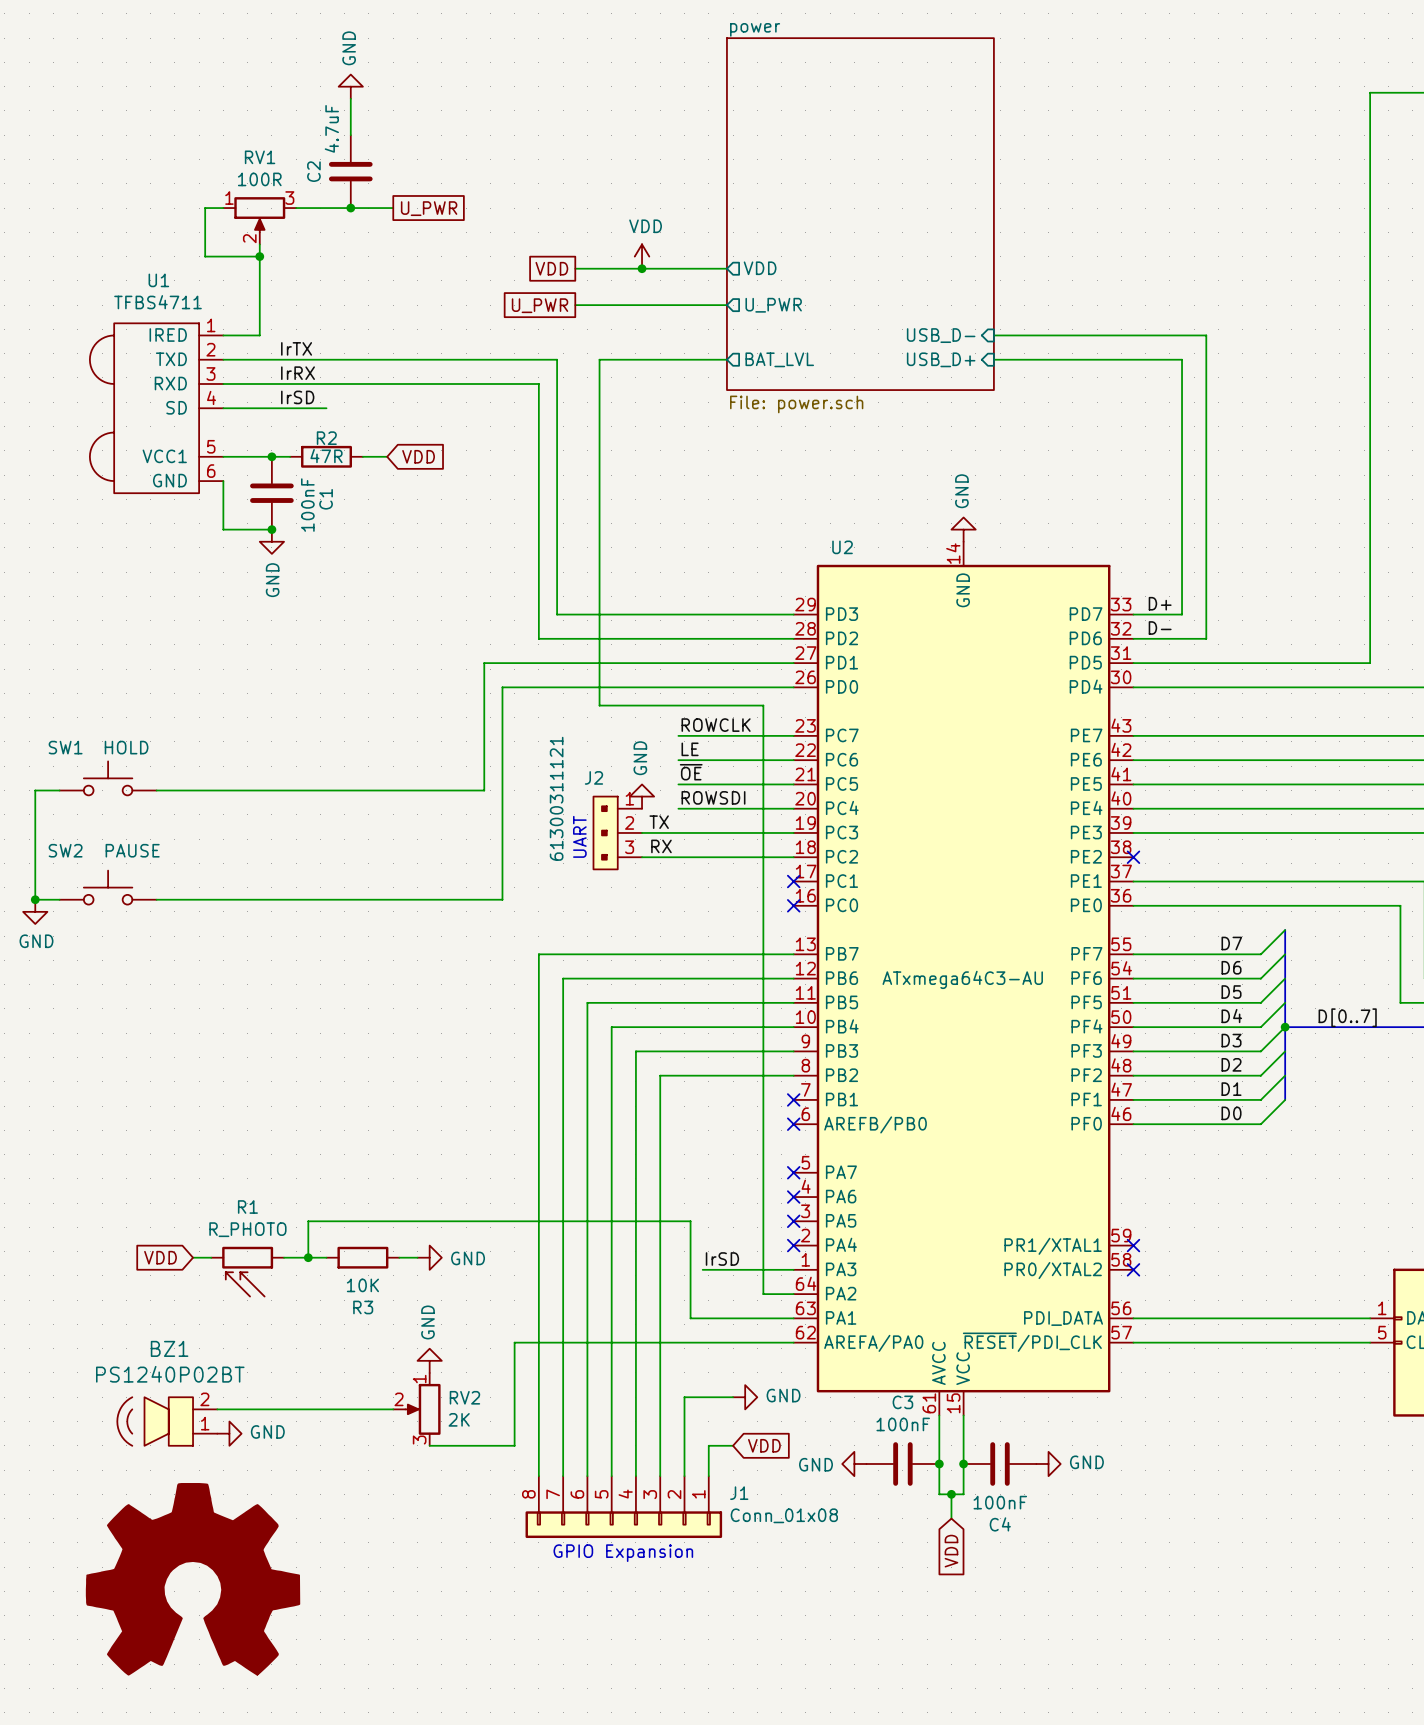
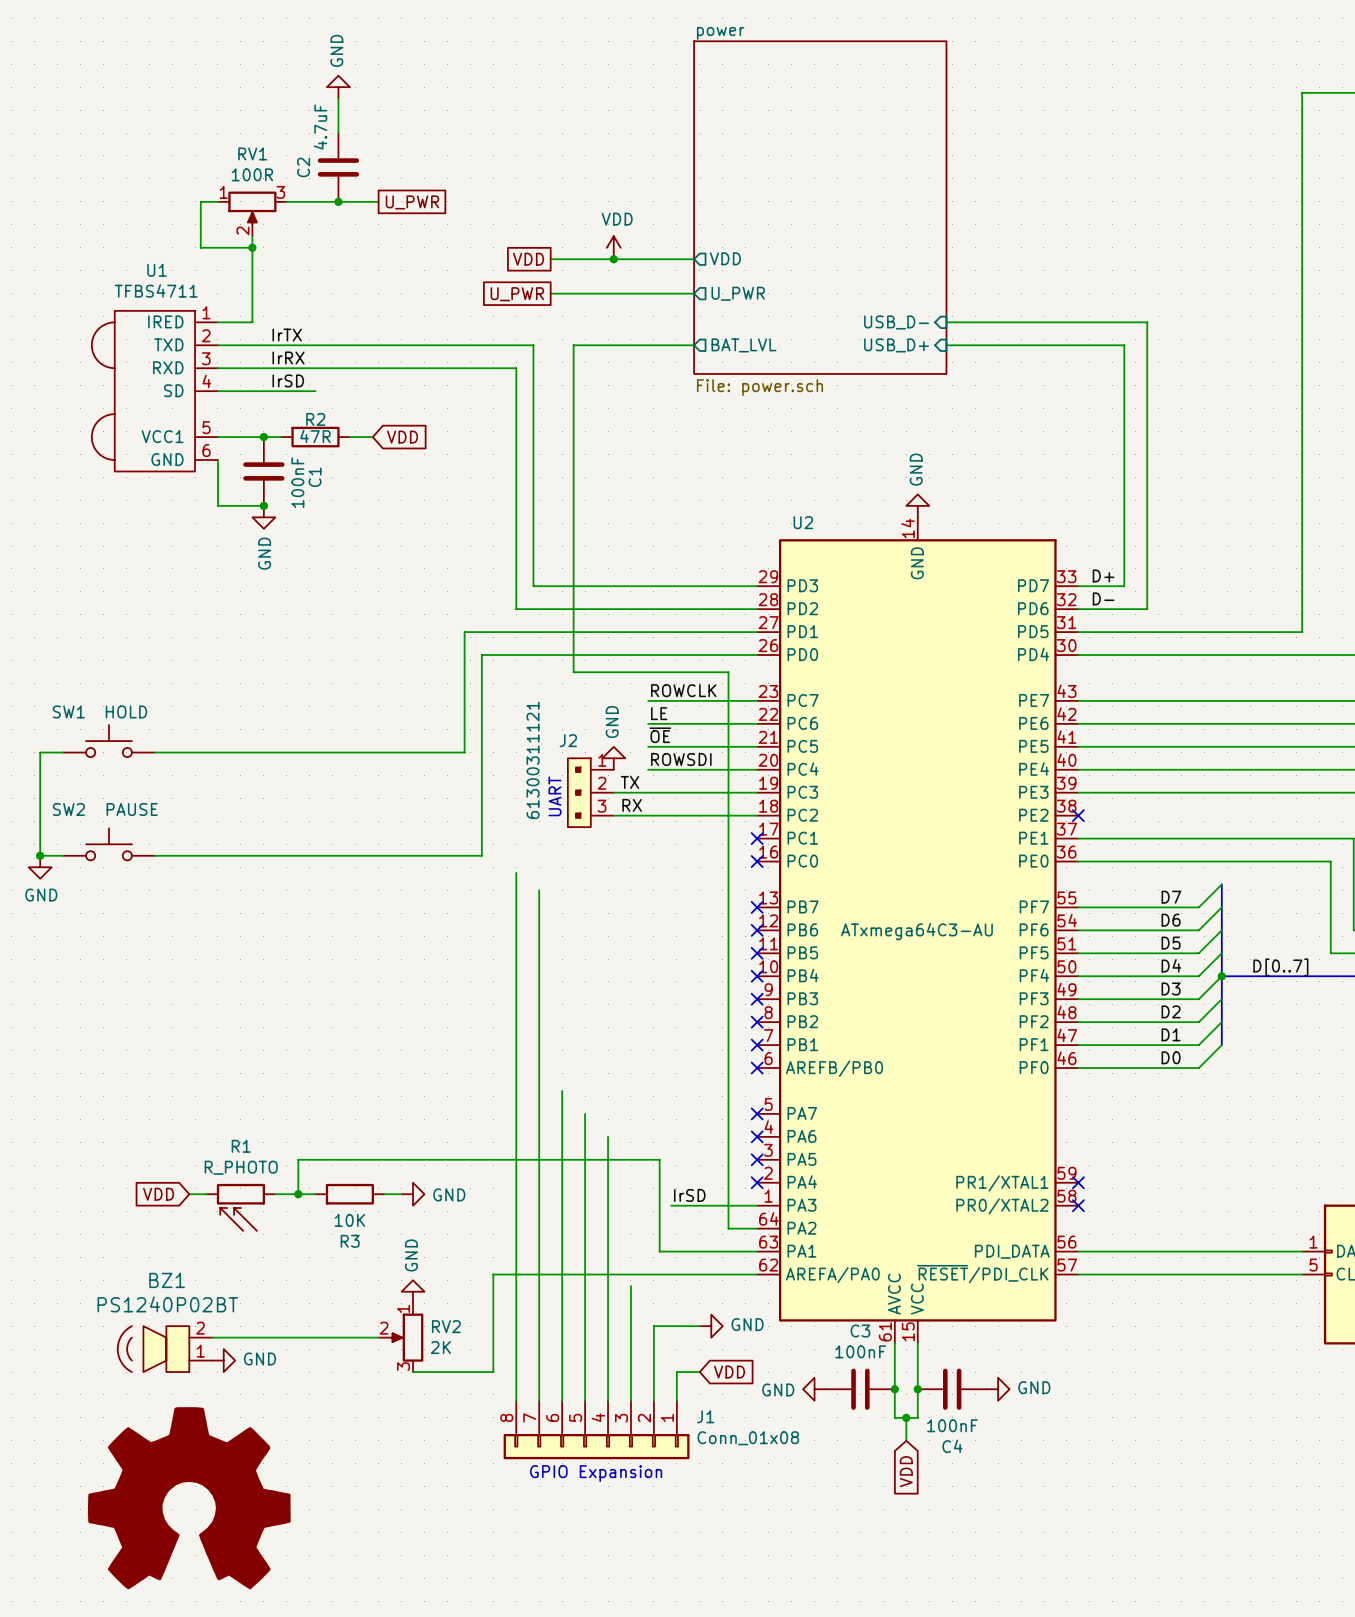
wire: (538, 954) (793, 954) -> (516, 907) (516, 873)
no-connect mark: none -> (757, 907)
wire: (563, 978) (793, 978) -> (539, 930) (539, 890)
no-connect mark: none -> (757, 930)
wire: (793, 1002) (587, 1002) (587, 1148) -> none
no-connect mark: none -> (757, 953)
wire: (793, 1027) (611, 1027) (611, 1172) -> none
no-connect mark: none -> (757, 976)
wire: (793, 1051) (635, 1051) (635, 1197) -> none
no-connect mark: none -> (757, 999)
wire: (793, 1075) (660, 1075) (660, 1354) -> none
no-connect mark: none -> (757, 1022)

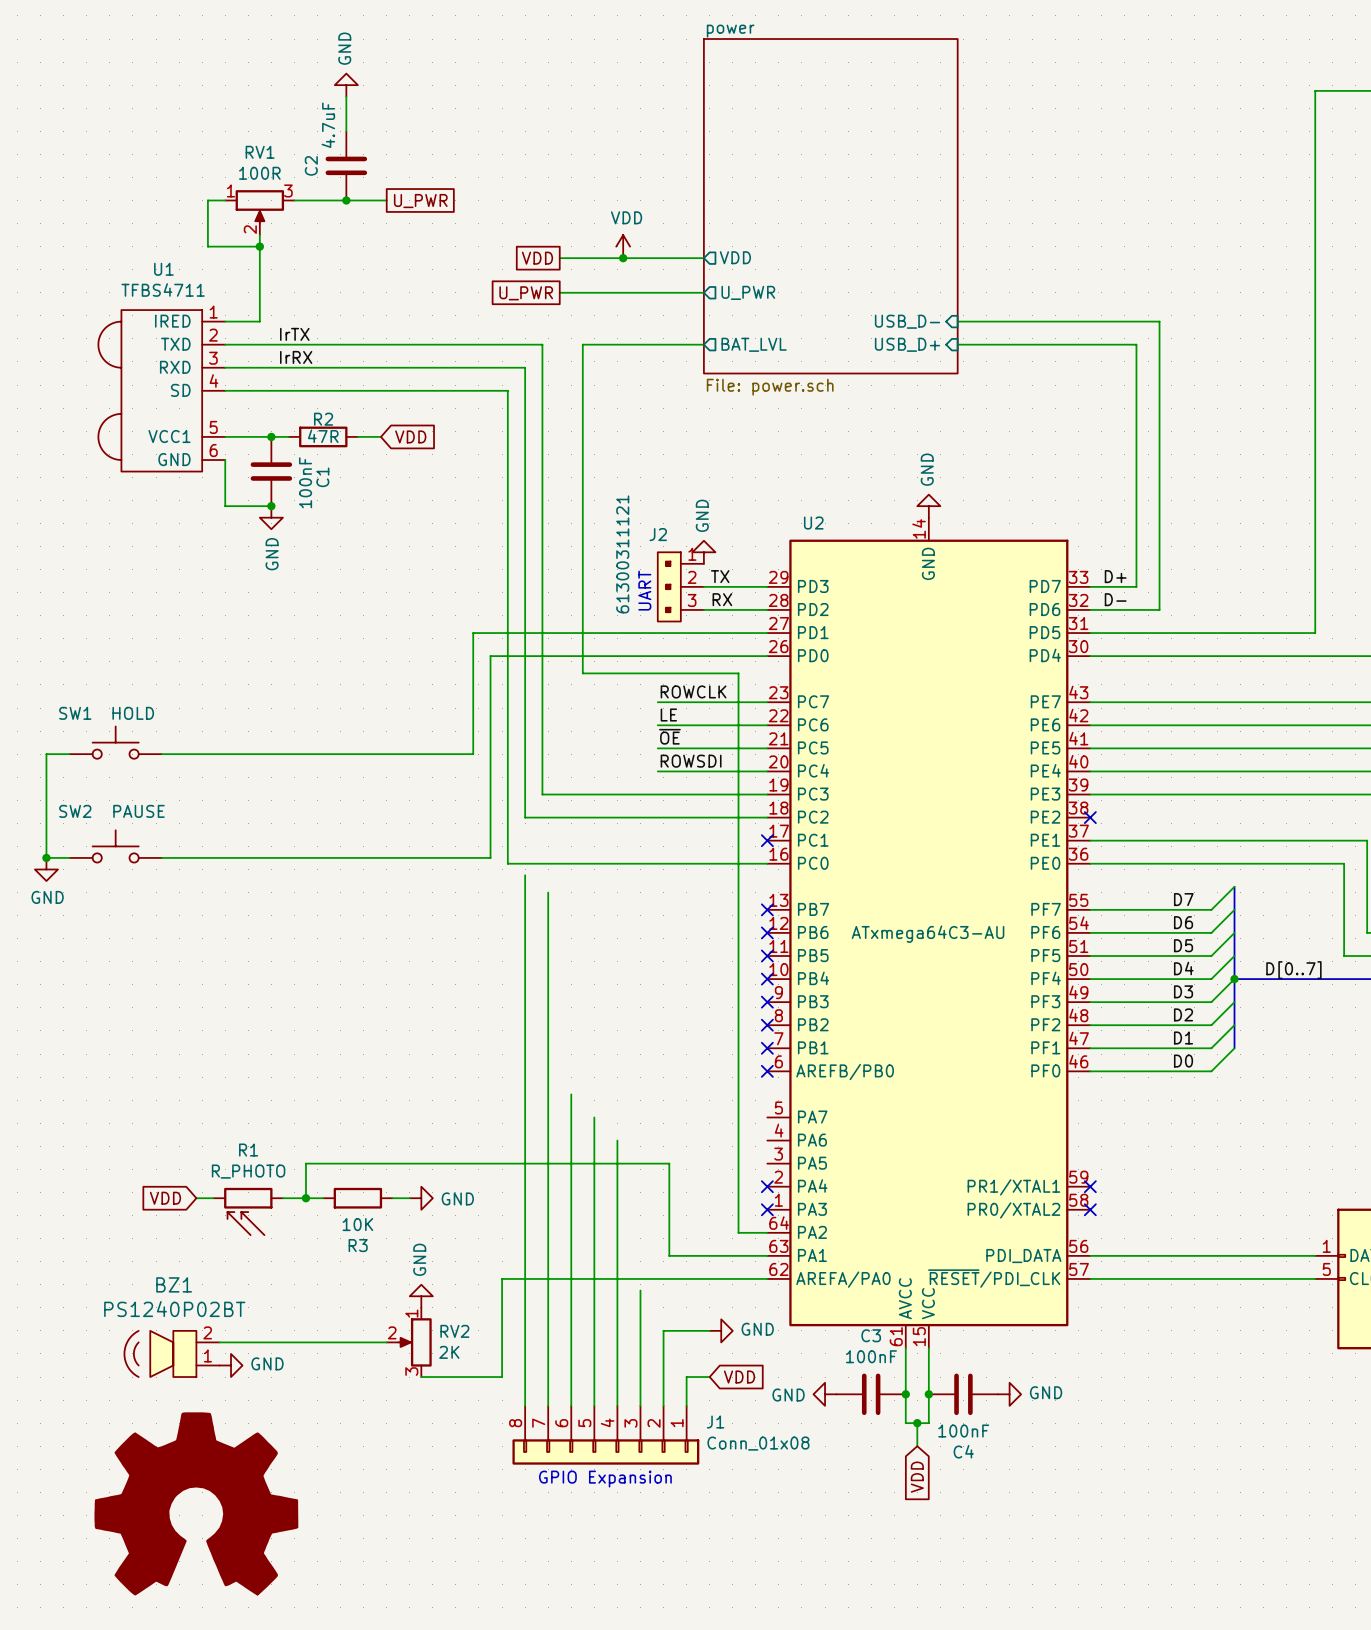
label: IrSD (288, 380) -> none
wire: none -> (323, 390) (507, 390) (507, 863) (767, 863)
wire: (533, 586) (694, 586) -> (542, 586) (542, 794) (623, 794)
wire: (516, 609) (694, 609) -> (525, 609) (525, 817) (623, 817)
power symbol position: GND (613, 758) -> GND (703, 552)
label position: TX (629, 782) -> TX (720, 576)
J2 position: (590, 792) -> (680, 586)
text position: UART (555, 796) -> UART (644, 590)
label position: RX (632, 805) -> RX (722, 599)
no-connect mark: (757, 861) -> none
no-connect mark: (757, 1113) -> none
no-connect mark: (757, 1136) -> none
no-connect mark: (757, 1159) -> none
label: IrSD (689, 1195) -> none
wire: (671, 1205) (757, 1205) -> none
no-connect mark: none -> (767, 1209)

